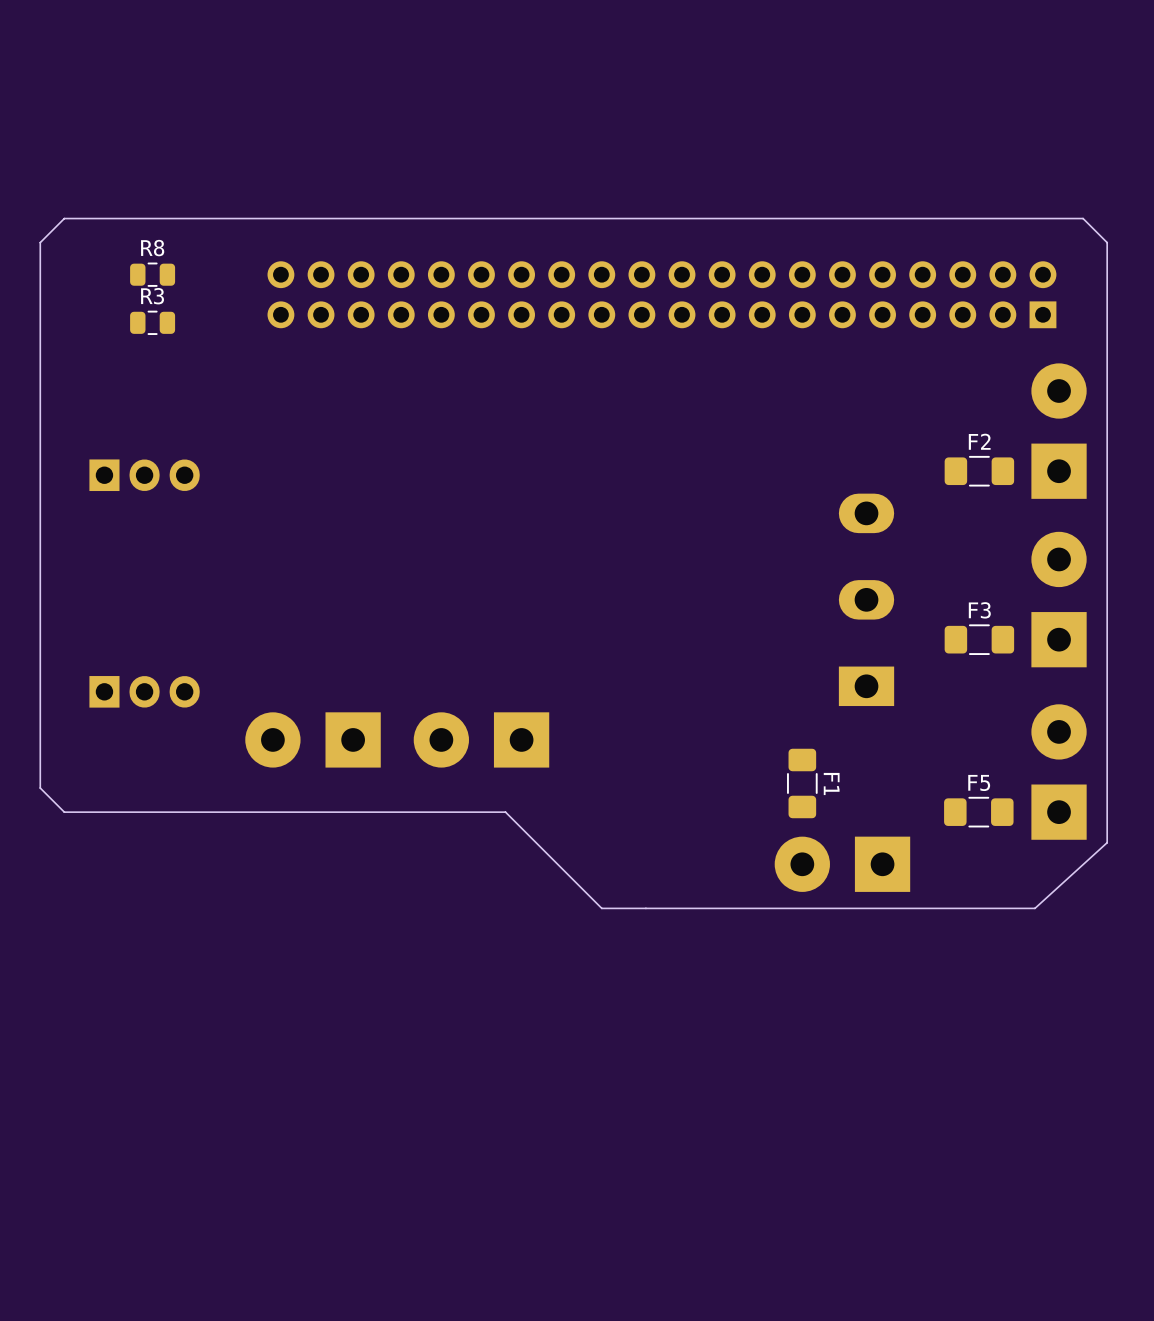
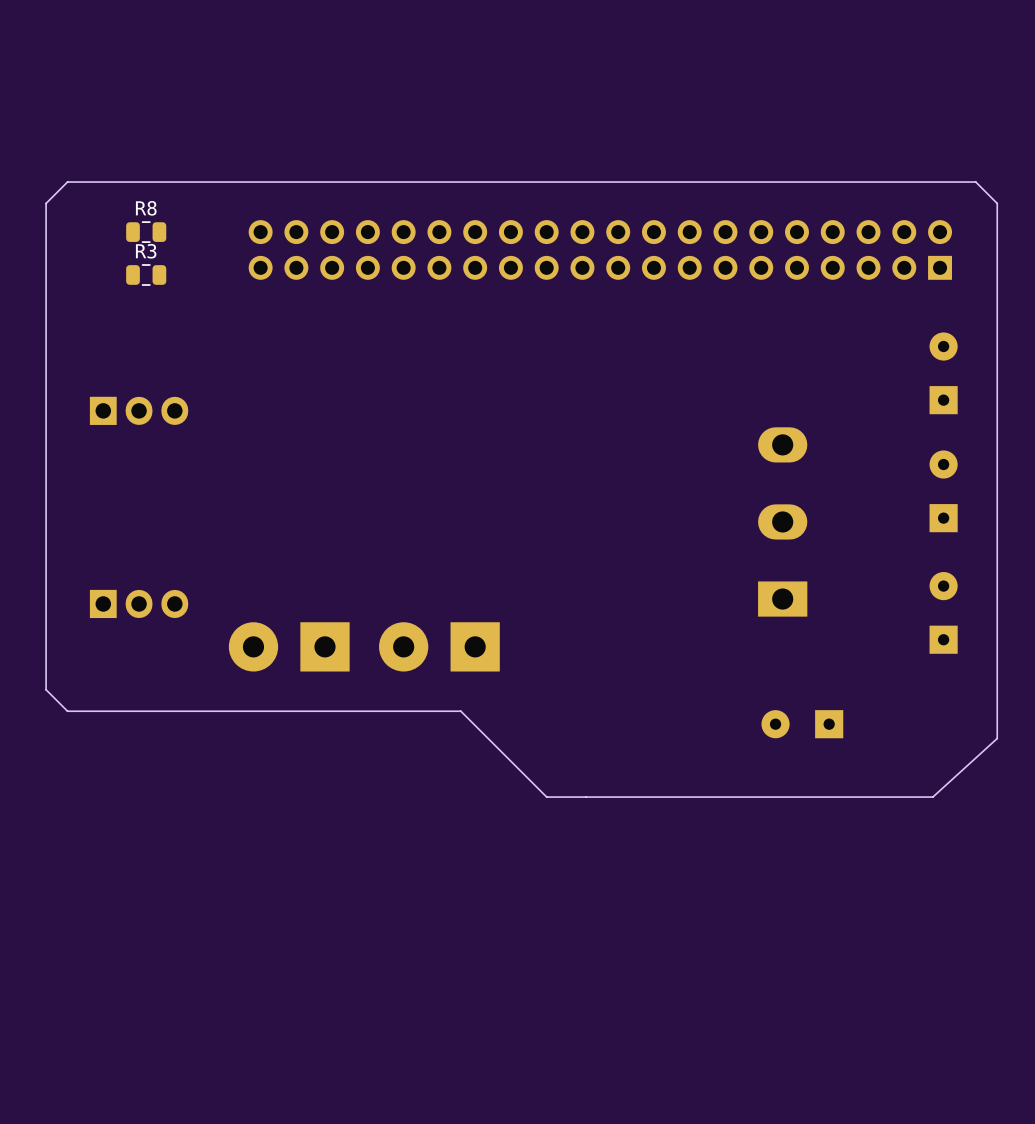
part footprint: [1031, 363, 1087, 499] -> [929, 332, 958, 415]
F2: (979, 471) -> none
part: none -> (943, 491)
part: (1059, 599) -> none
F3: (979, 639) -> none
part: none -> (943, 612)
part: (1059, 772) -> none
F1: (802, 783) -> none
F5: (978, 812) -> none
part: none -> (802, 724)
part: (842, 864) -> none

